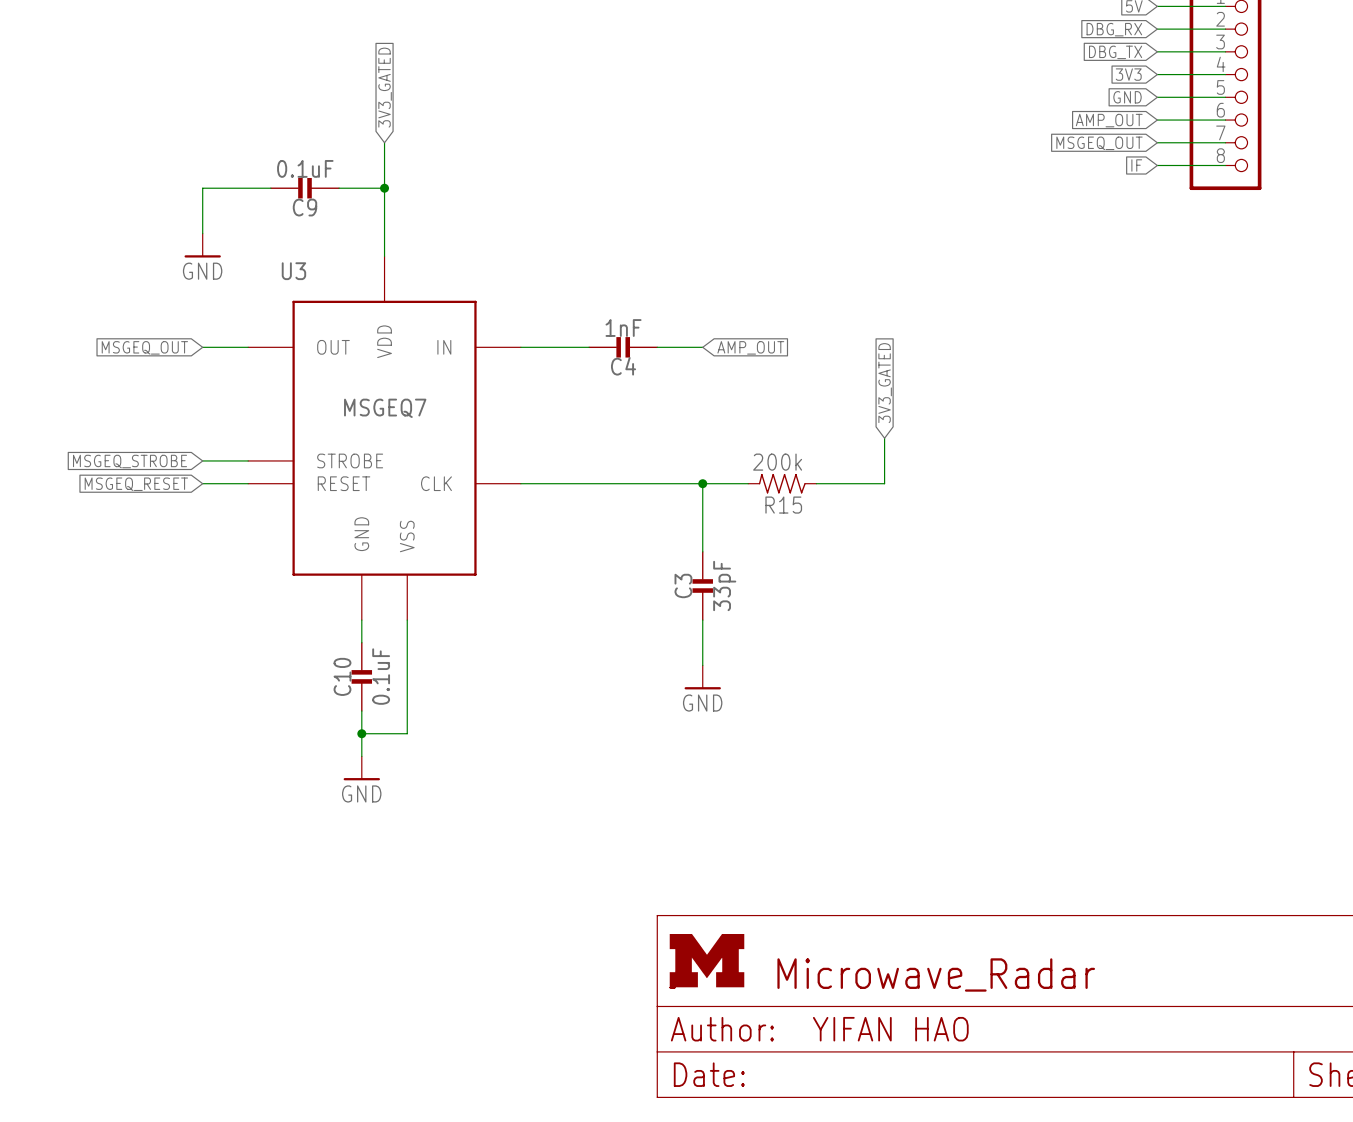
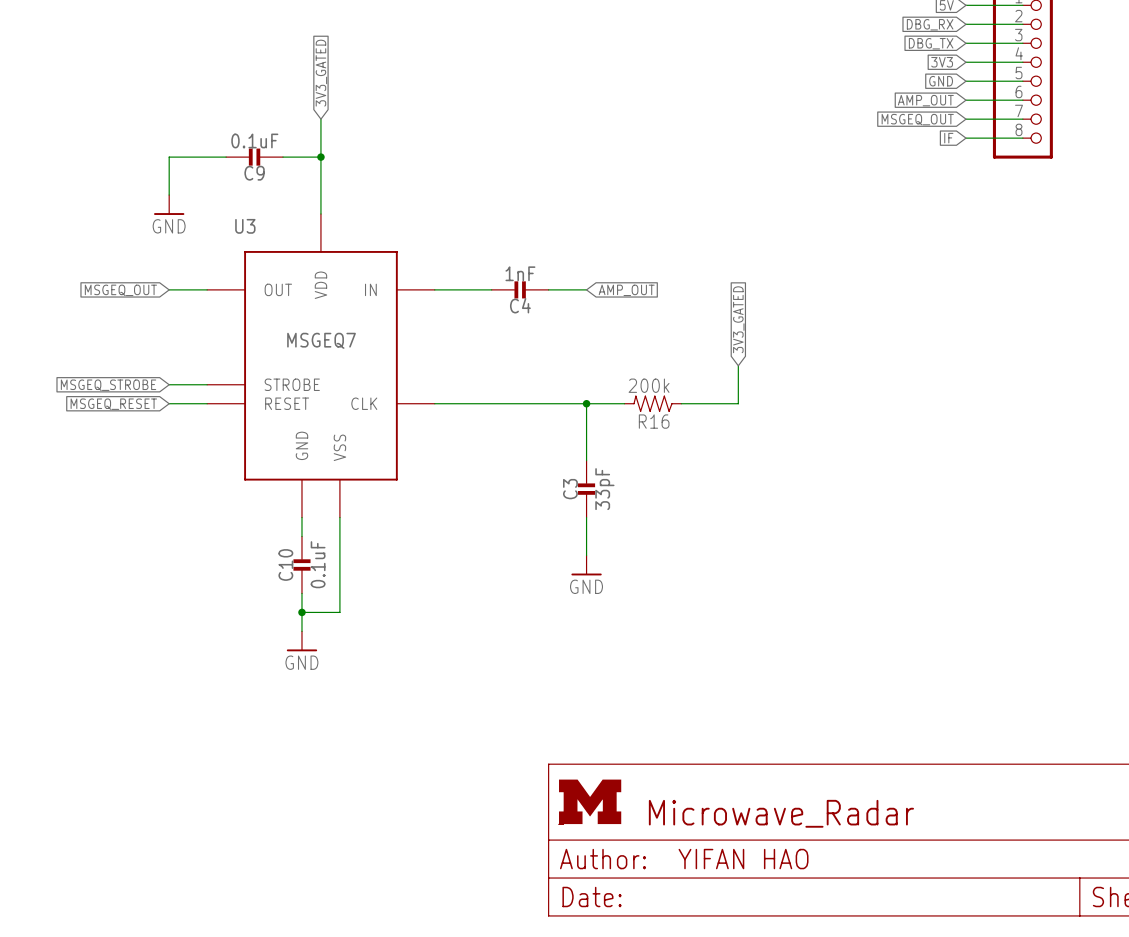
R15 name: R15 (783, 505) -> R16 (654, 421)

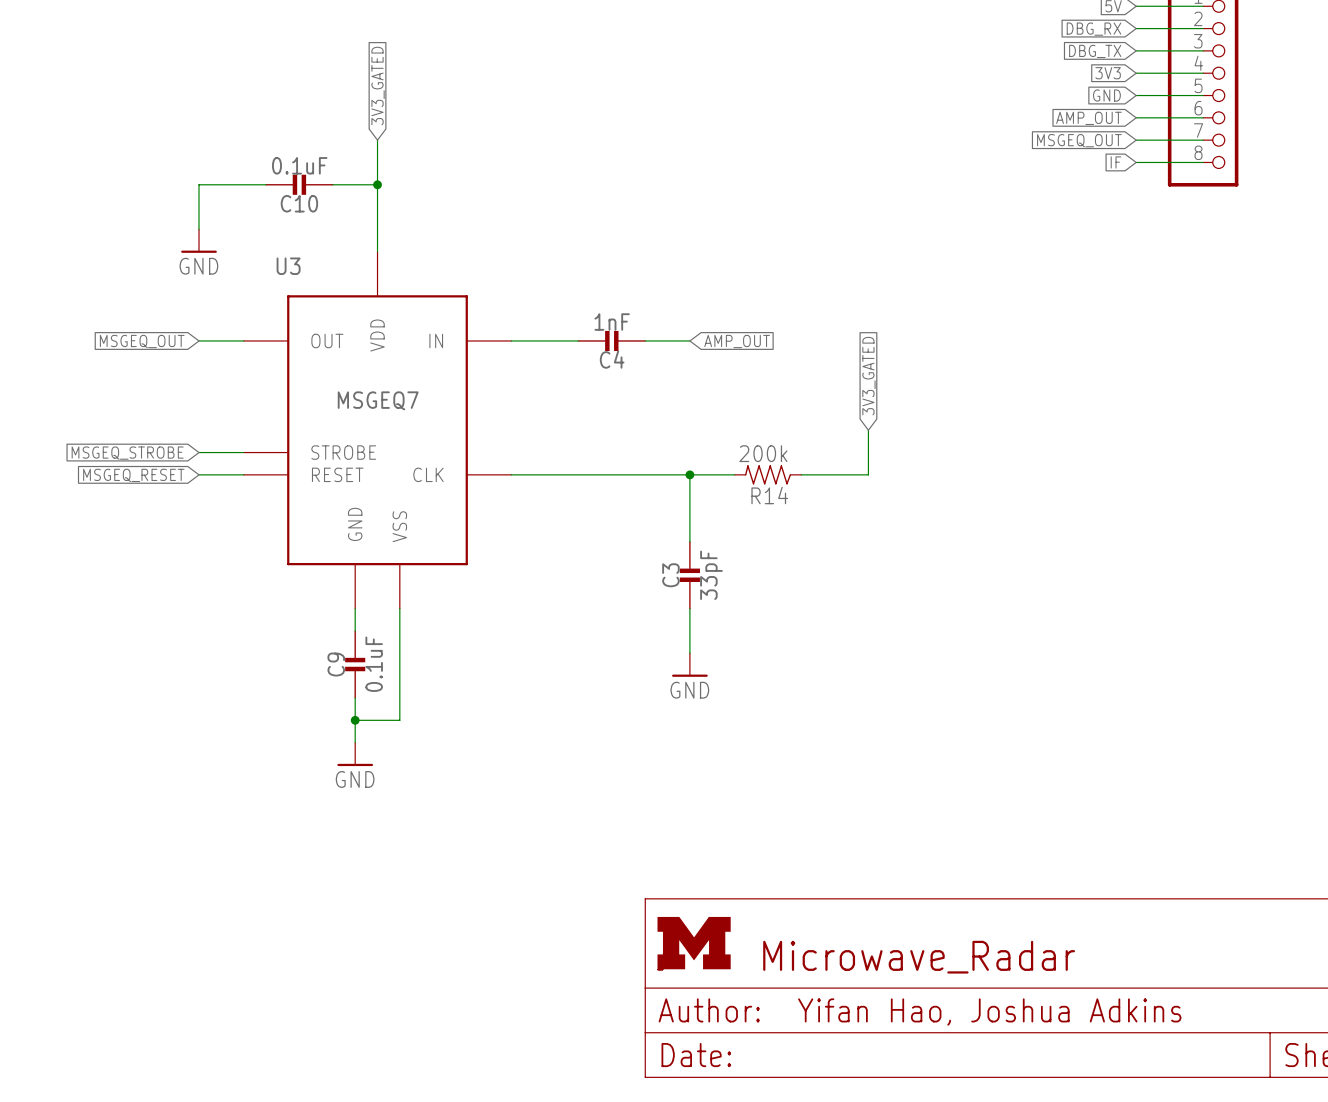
C9 name: C9 (254, 173) -> C10 (299, 203)
R16 name: R16 (654, 421) -> R14 (769, 495)
C10 name: C10 (285, 564) -> C9 (336, 664)
part text: YIFAN HAO (743, 859) -> Yifan Hao, Joshua Adkins (989, 1012)

